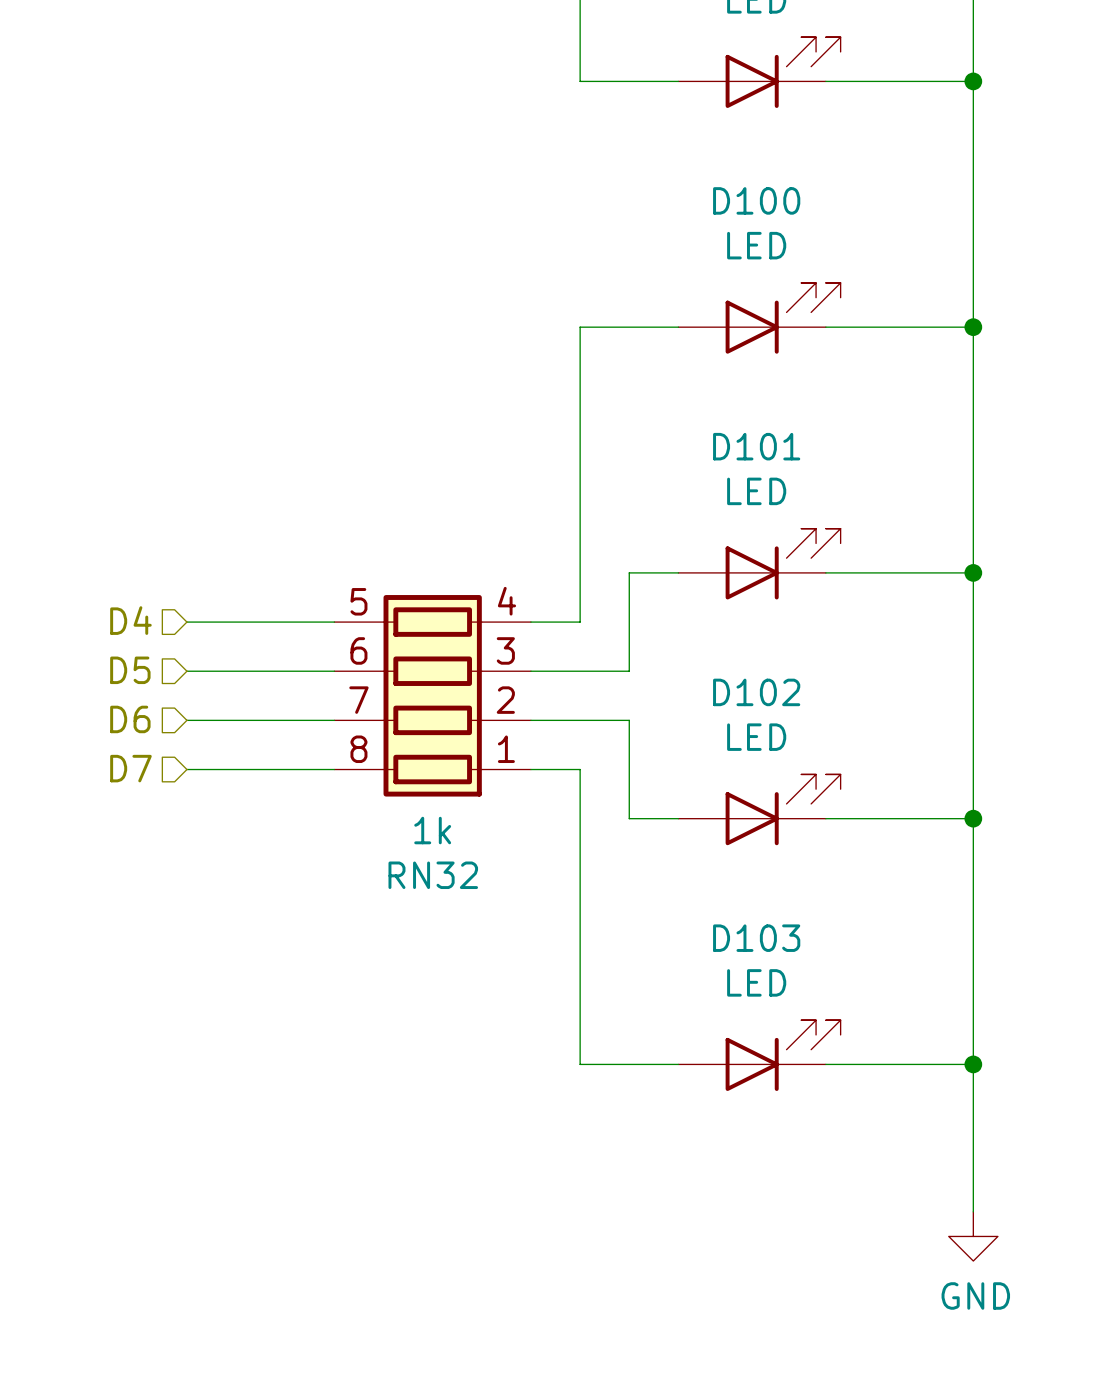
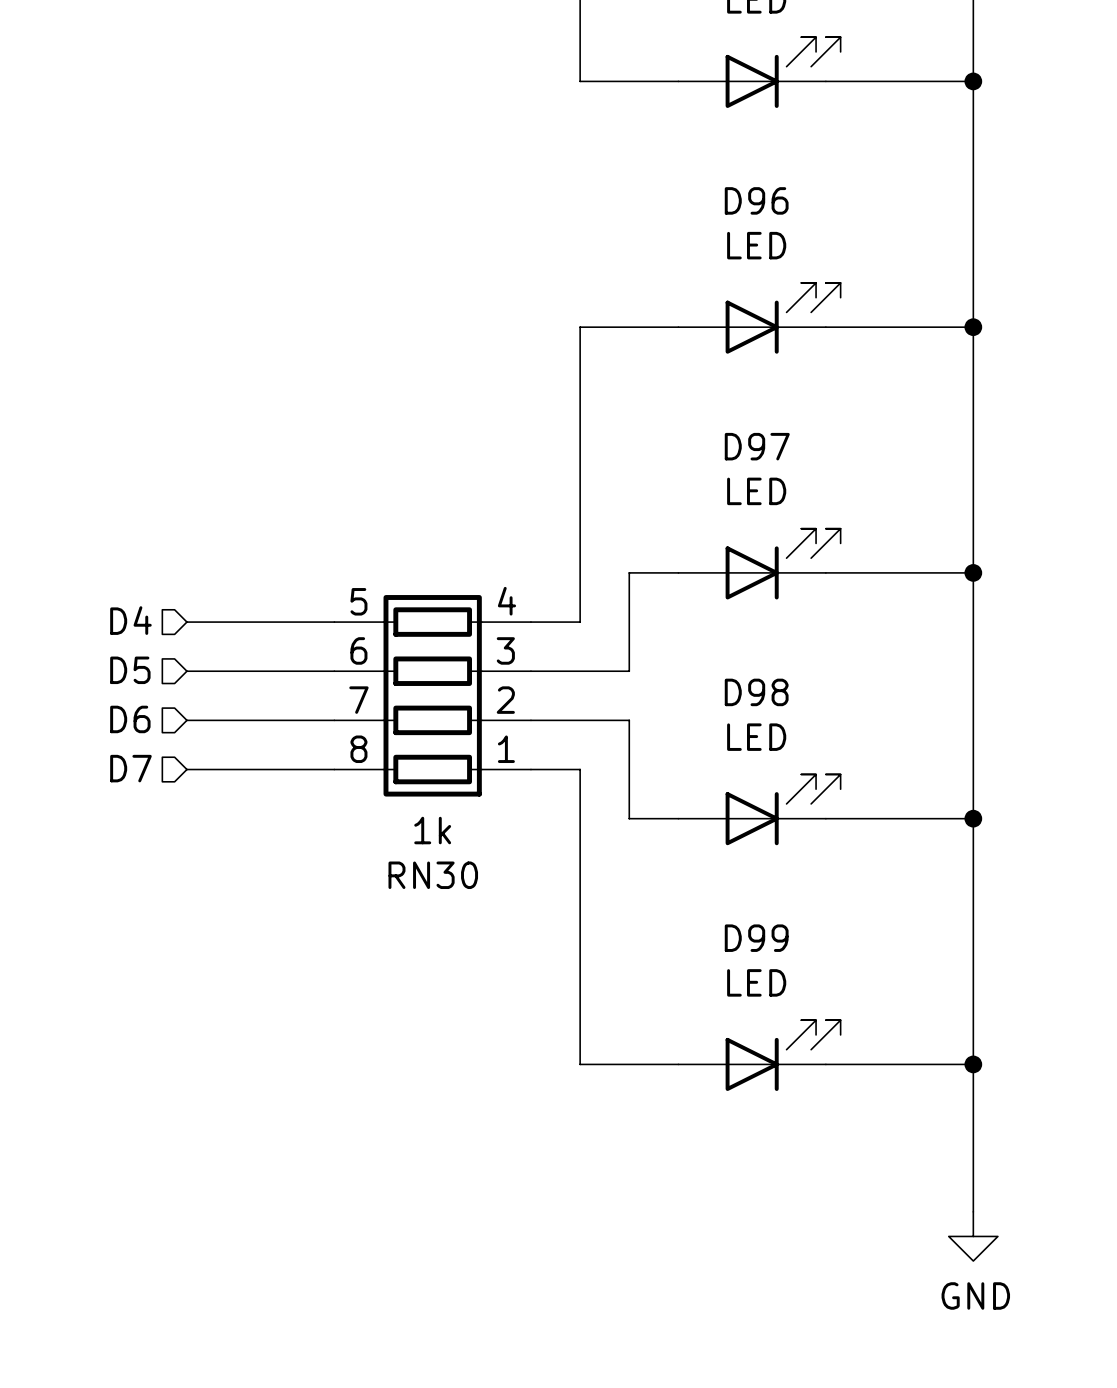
D100 name: D100 (756, 200) -> D96 (756, 200)
D101 name: D101 (756, 446) -> D97 (757, 446)
D102 name: D102 (756, 692) -> D98 (756, 692)
RN32 name: RN32 (433, 875) -> RN30 (433, 875)
D103 name: D103 (756, 938) -> D99 (756, 938)

